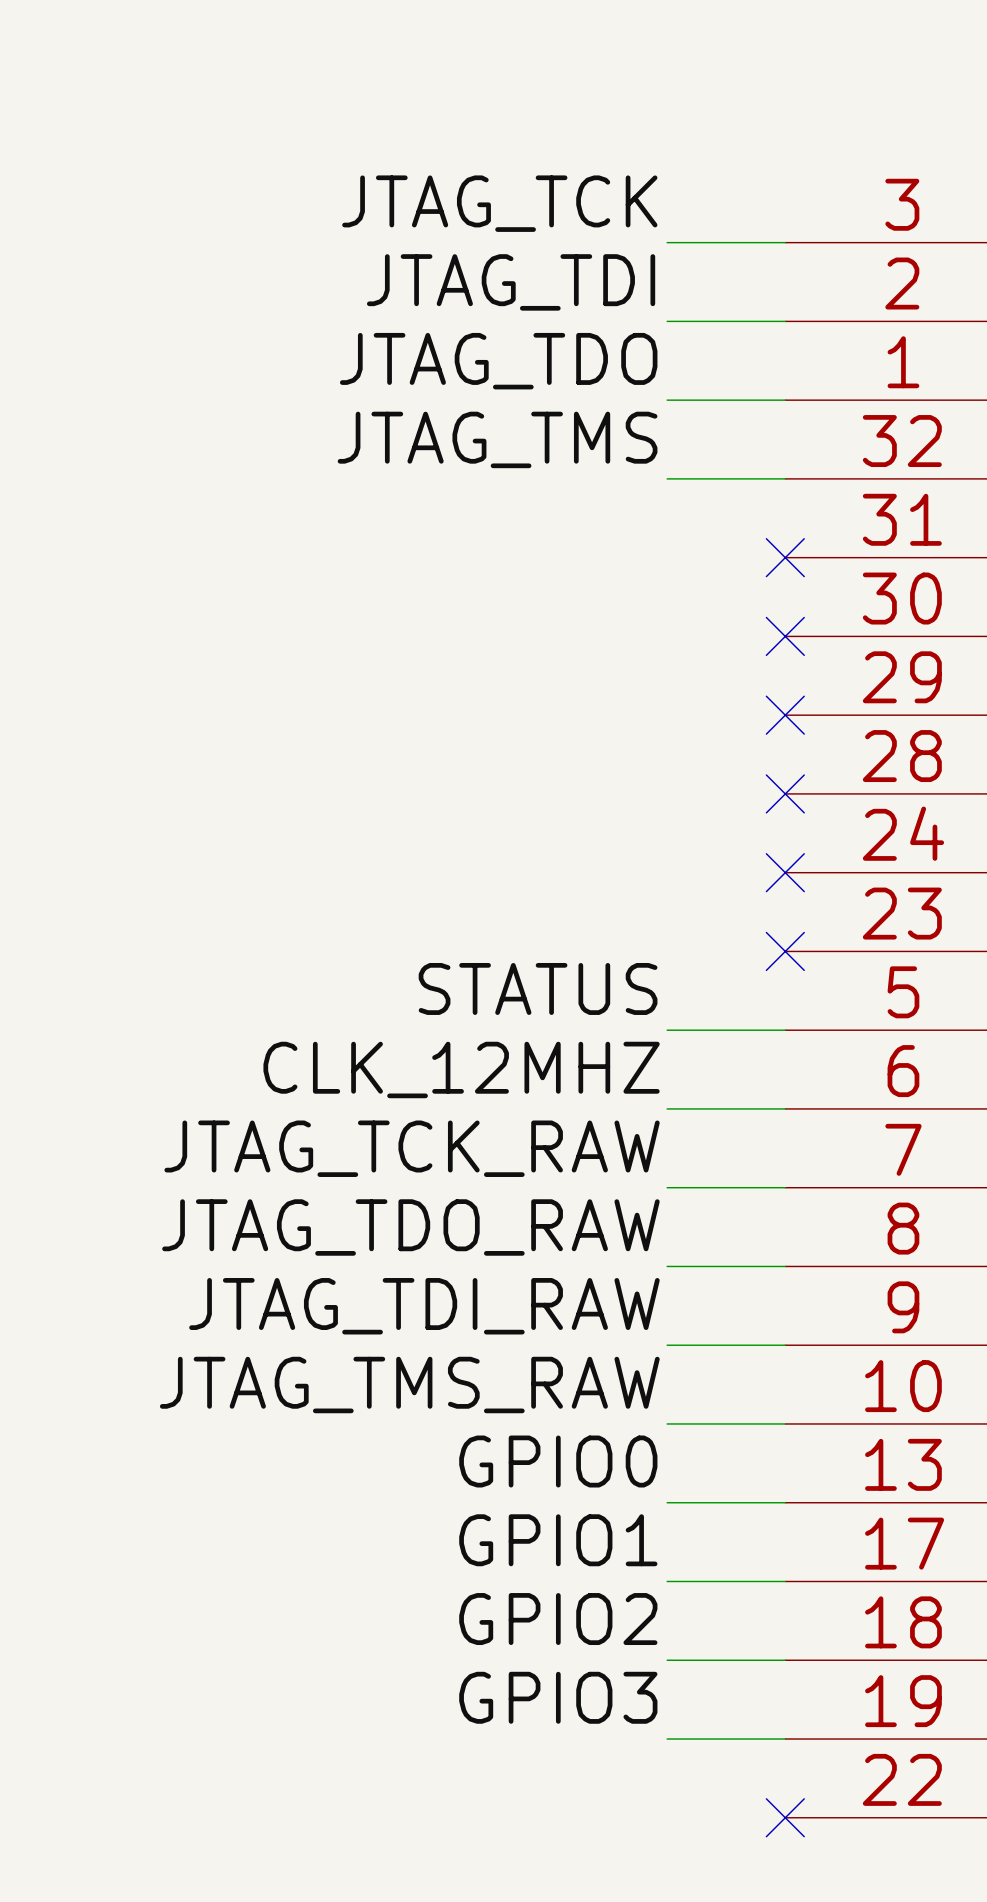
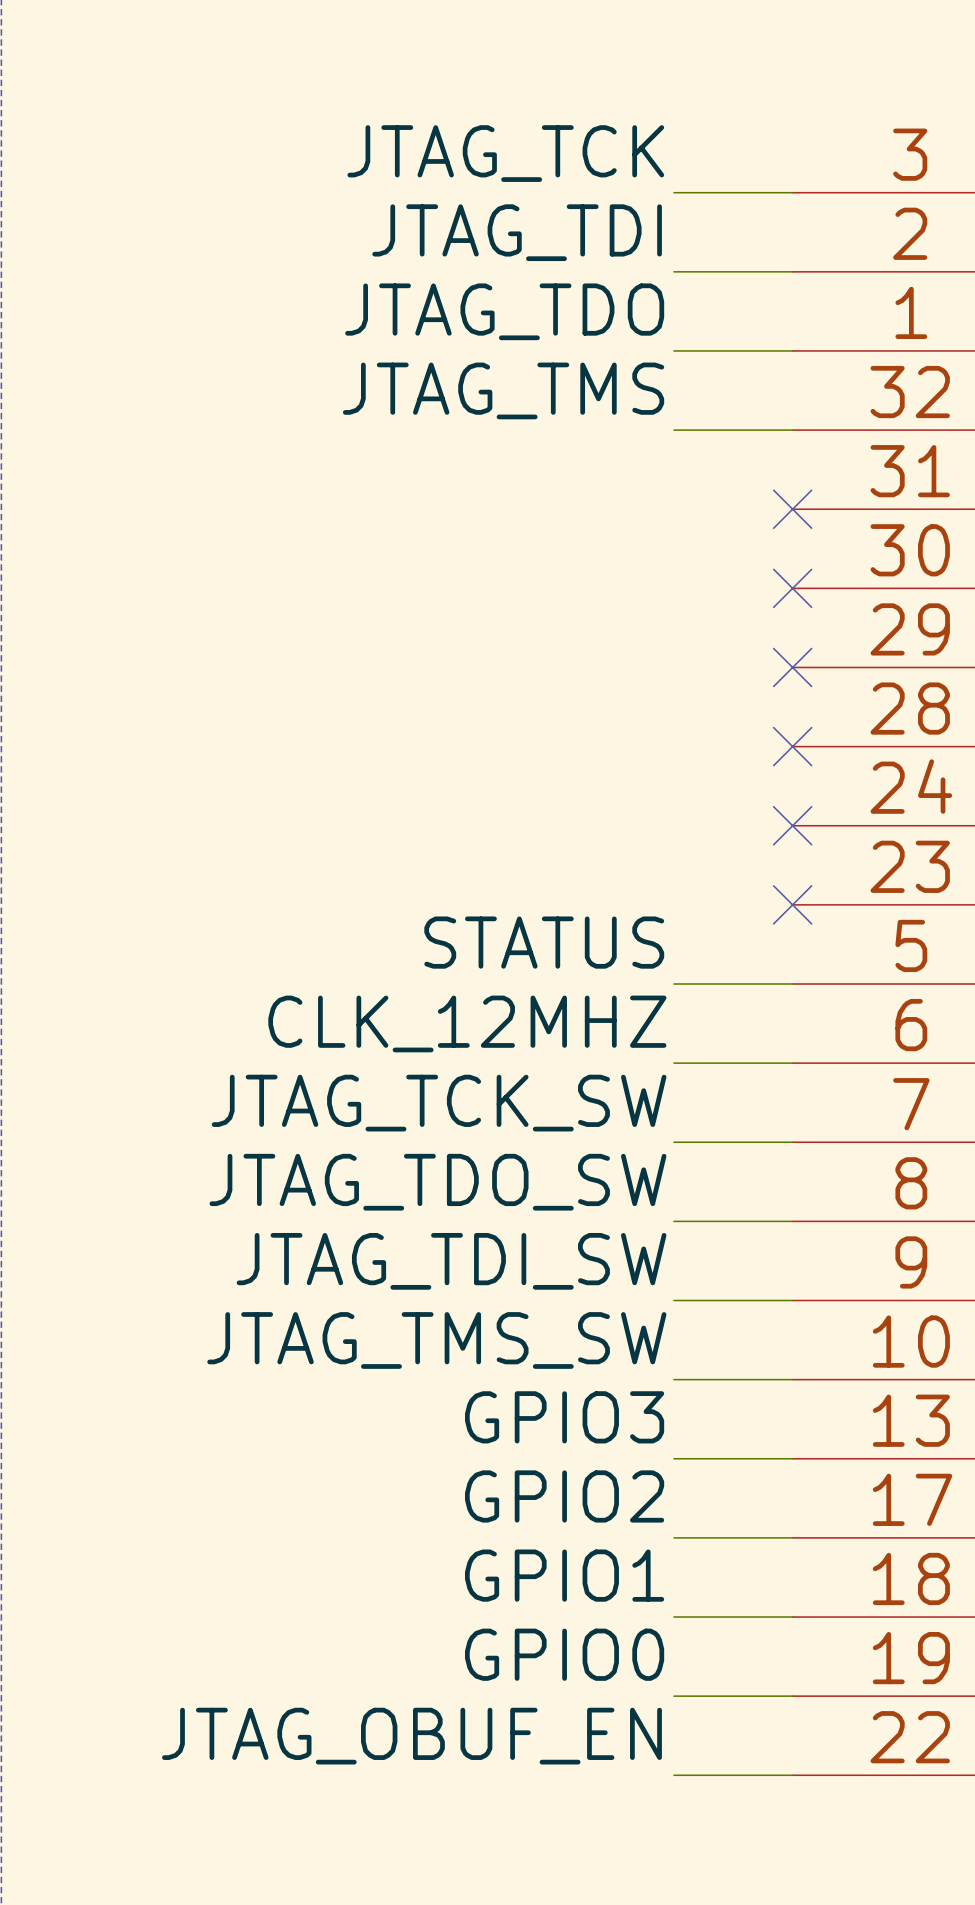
label: JTAG_TCK_RAW (412, 1148) -> JTAG_TCK_SW (439, 1103)
label: JTAG_TDO_RAW (410, 1227) -> JTAG_TDO_SW (437, 1182)
label: JTAG_TDI_RAW (424, 1306) -> JTAG_TDI_SW (451, 1261)
label: JTAG_TMS_RAW (409, 1385) -> JTAG_TMS_SW (436, 1340)
label: GPIO0 (558, 1461) -> GPIO3 (564, 1417)
label: GPIO1 (558, 1540) -> GPIO2 (564, 1496)
label: GPIO2 (558, 1619) -> GPIO1 (564, 1575)
label: GPIO3 (558, 1697) -> GPIO0 (564, 1654)
label: none -> JTAG_OBUF_EN (411, 1736)
wire: none -> (673, 1775) (792, 1775)
no-connect mark: (785, 1817) -> none

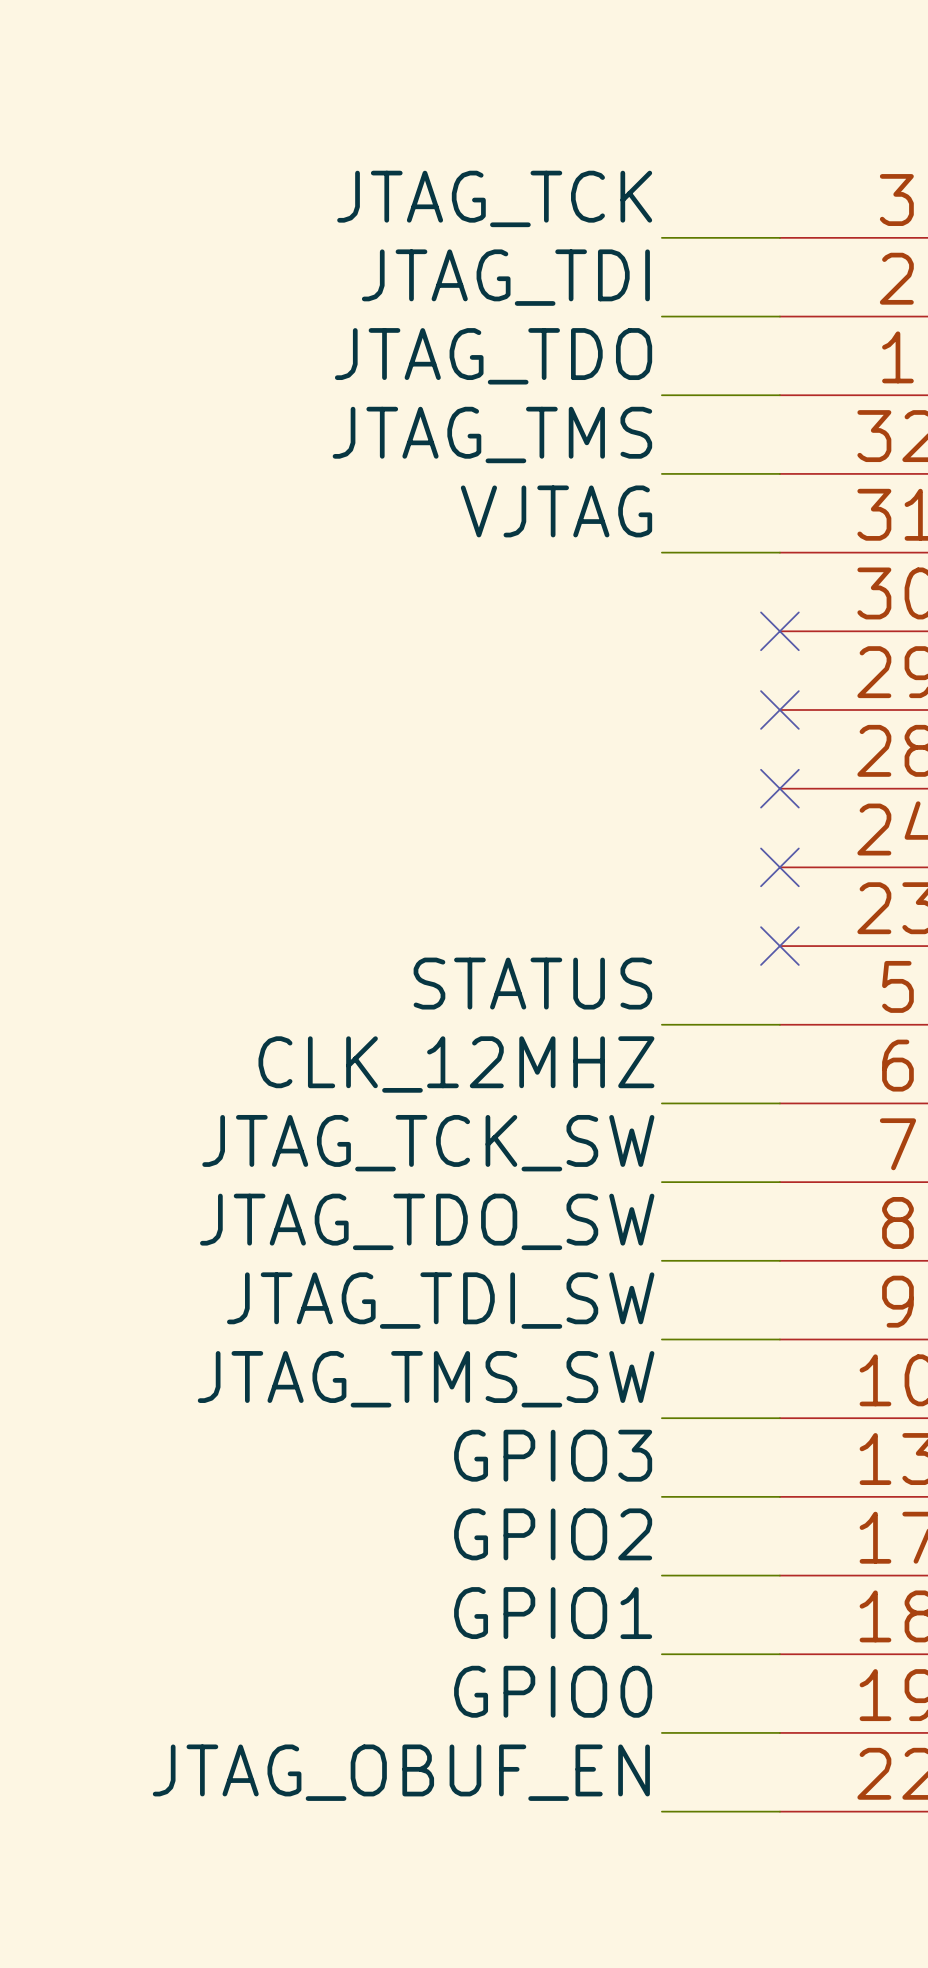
label: none -> VJTAG (556, 511)
wire: none -> (661, 552) (779, 552)
no-connect mark: (792, 509) -> none

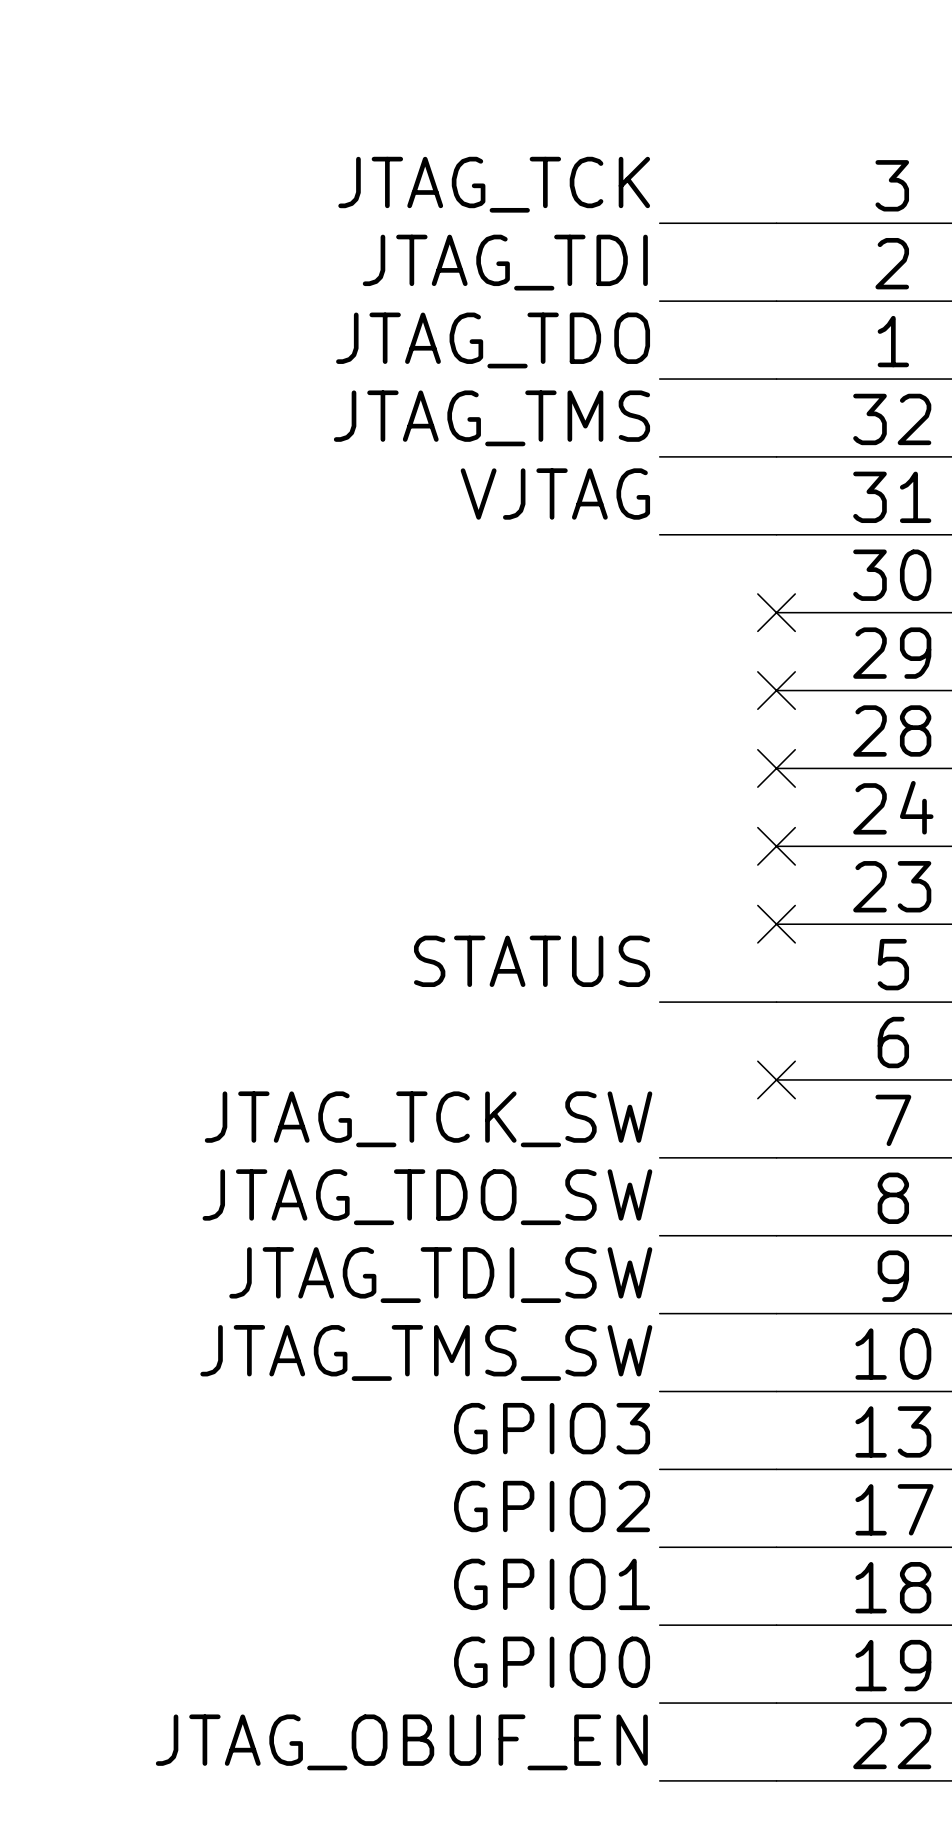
label: CLK_12MHZ (456, 1064) -> none
wire: (661, 1103) (779, 1103) -> none
no-connect mark: none -> (776, 1079)

